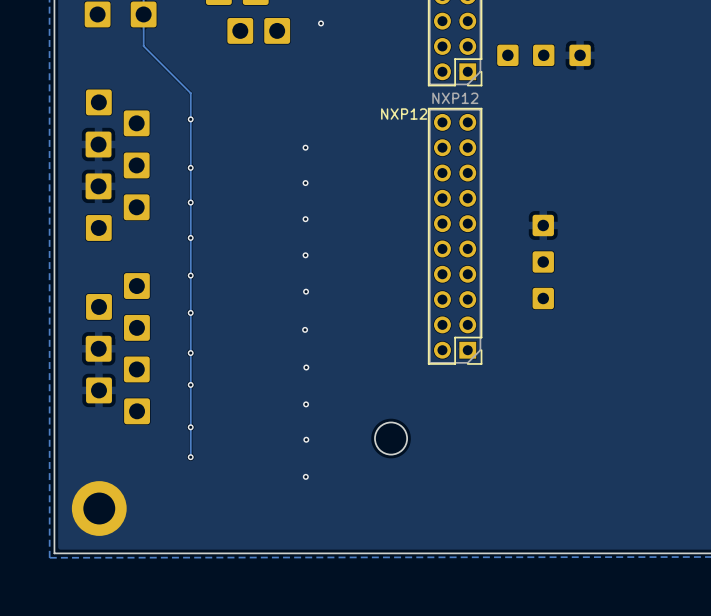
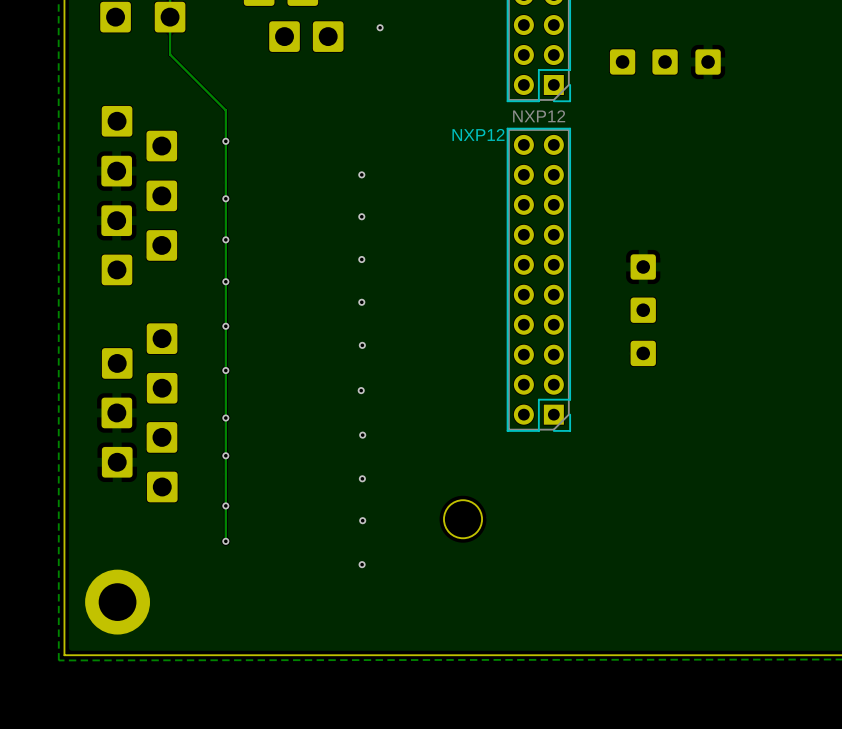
part: none -> (622, 61)
part: none -> (665, 61)
part: none -> (708, 62)
part: (507, 55) -> none
part: (543, 55) -> none
part: (580, 55) -> none

